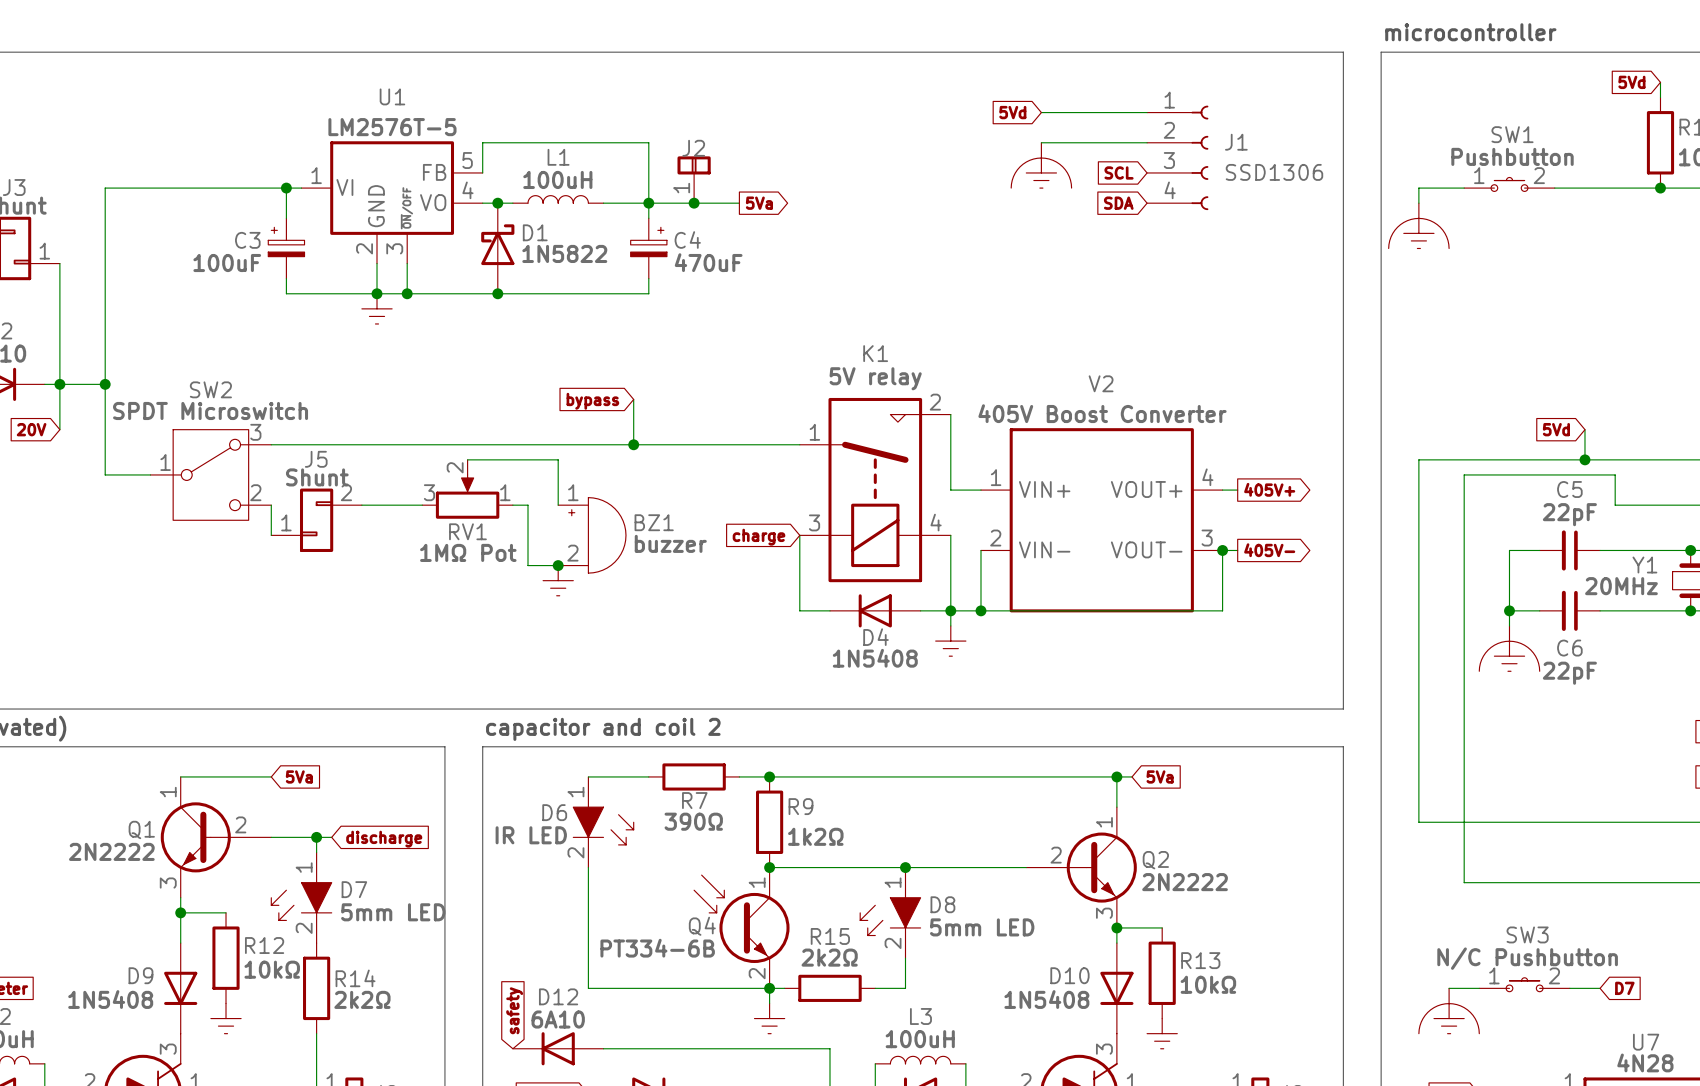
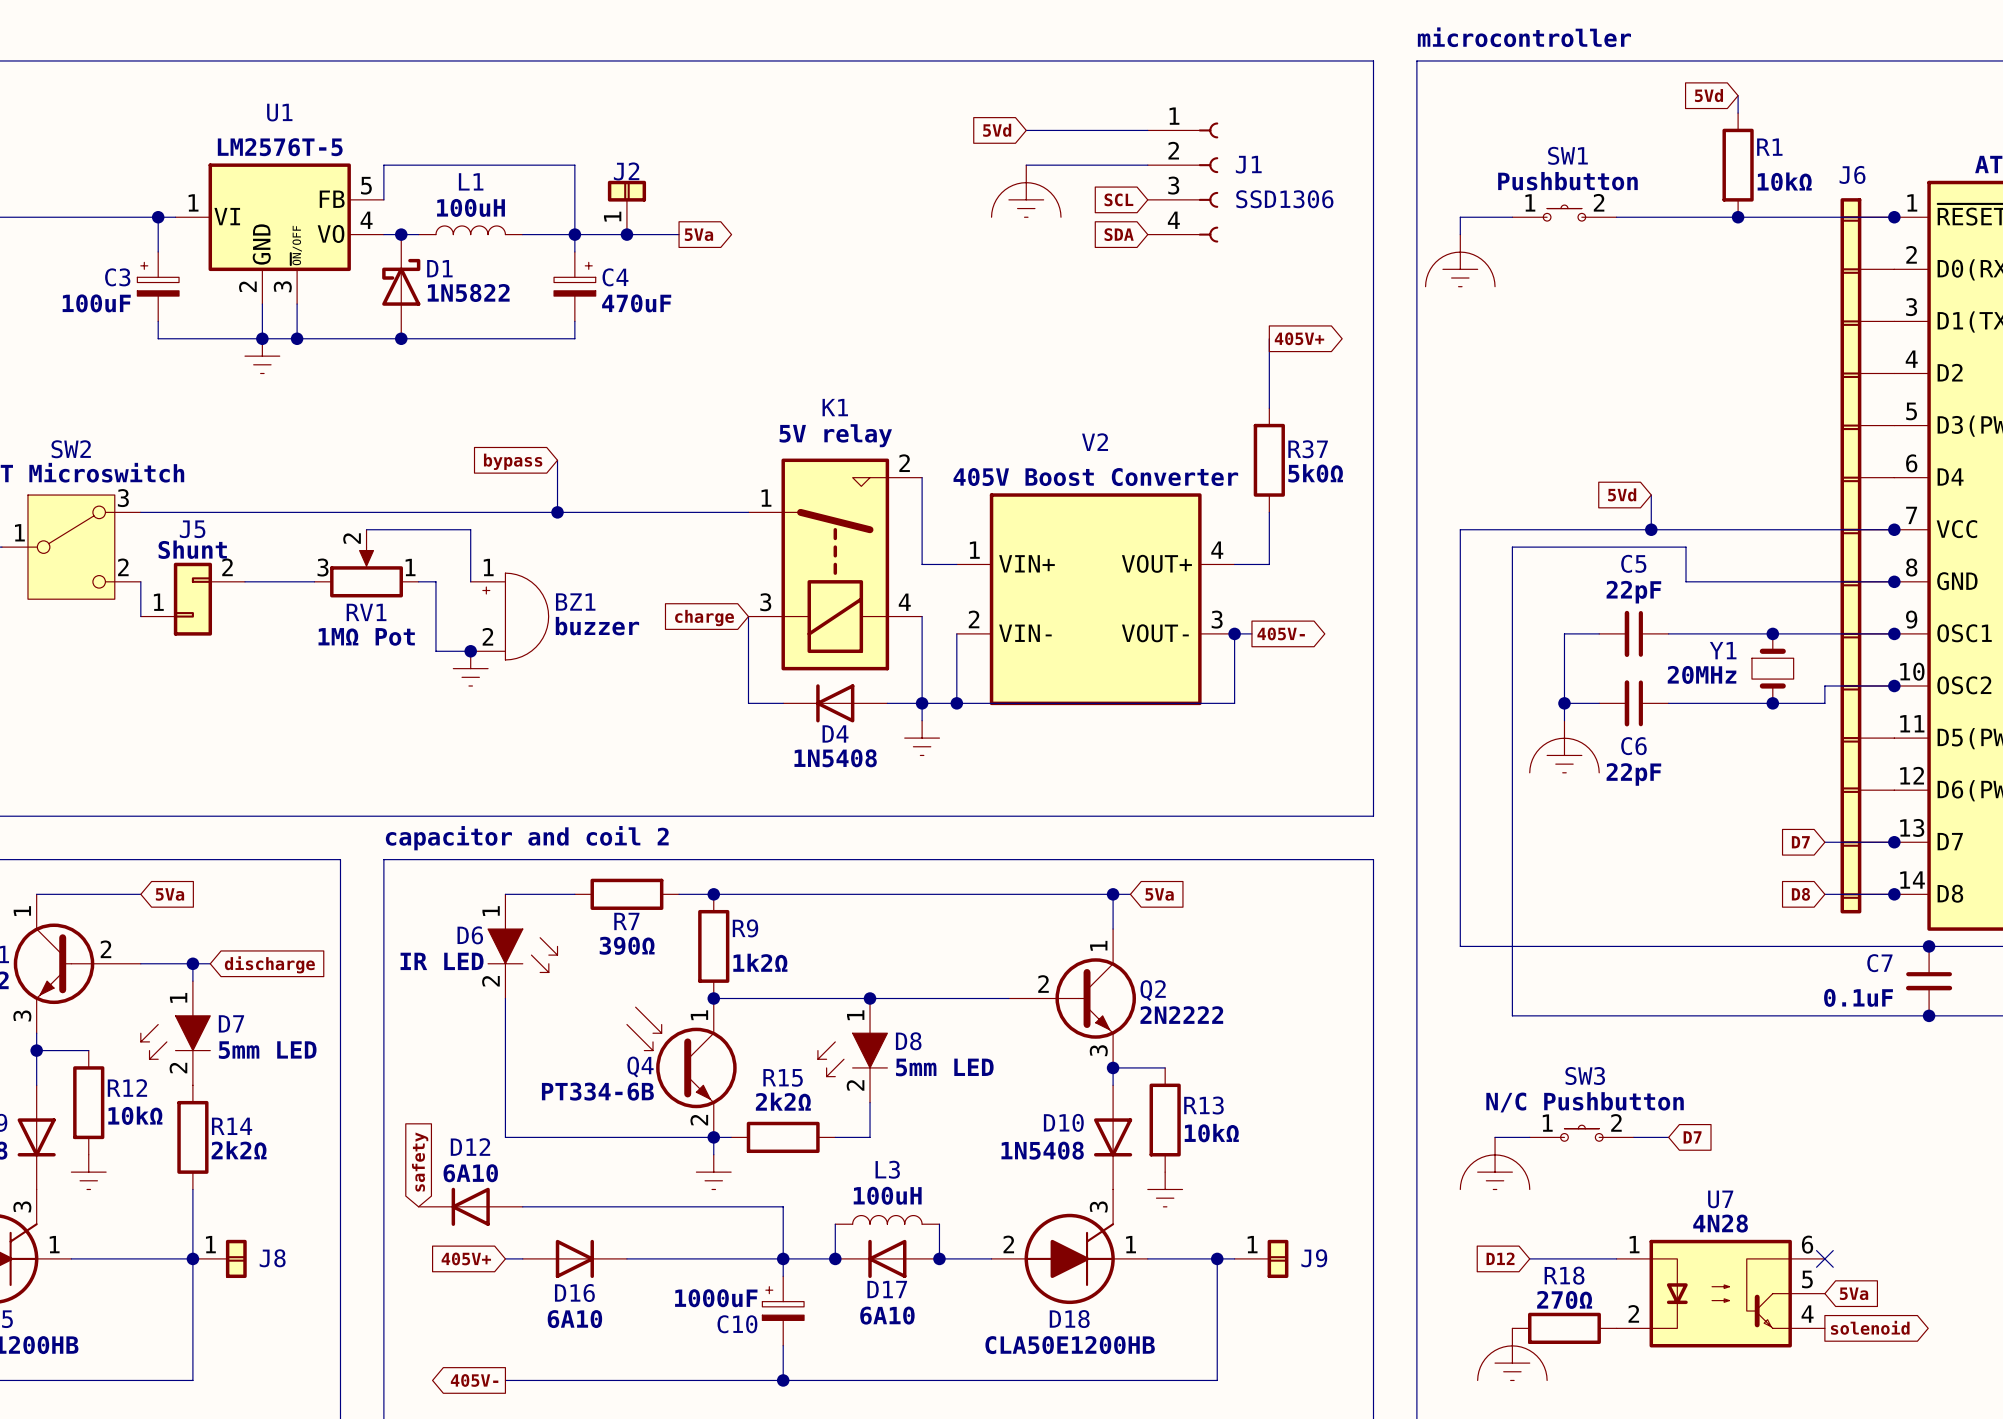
wire: none -> (1269, 338) (1269, 408)
R37: none -> 5k0Ω (1269, 460)
wire: none -> (1269, 512) (1269, 564) (1251, 564)
global label position: 405V+ (1269, 489) -> 405V+ (1299, 338)

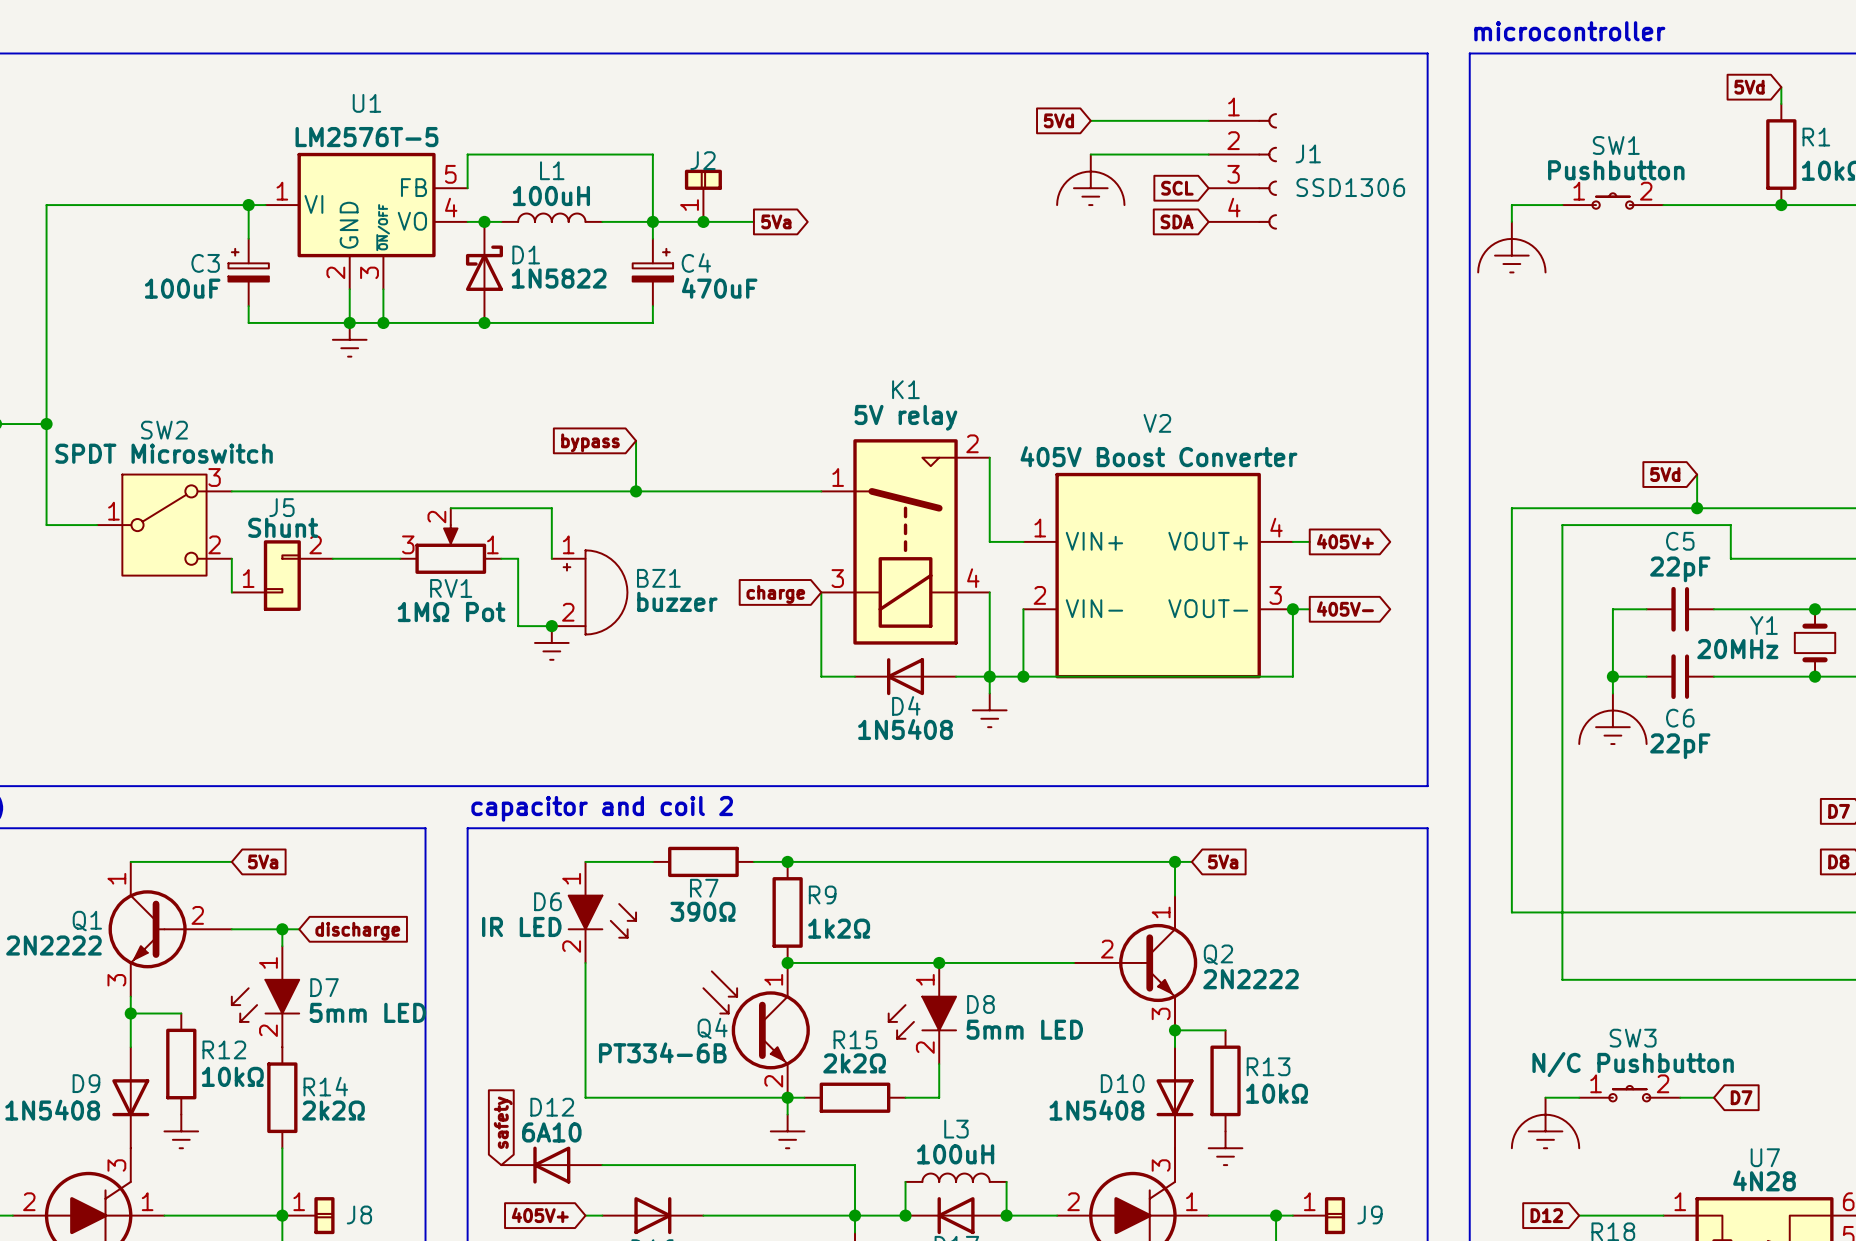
wire: (1269, 338) (1269, 408) -> none
global label position: 405V+ (1299, 338) -> 405V+ (1345, 541)
R37: 5k0Ω (1269, 460) -> none
wire: (1269, 512) (1269, 564) (1251, 564) -> none

